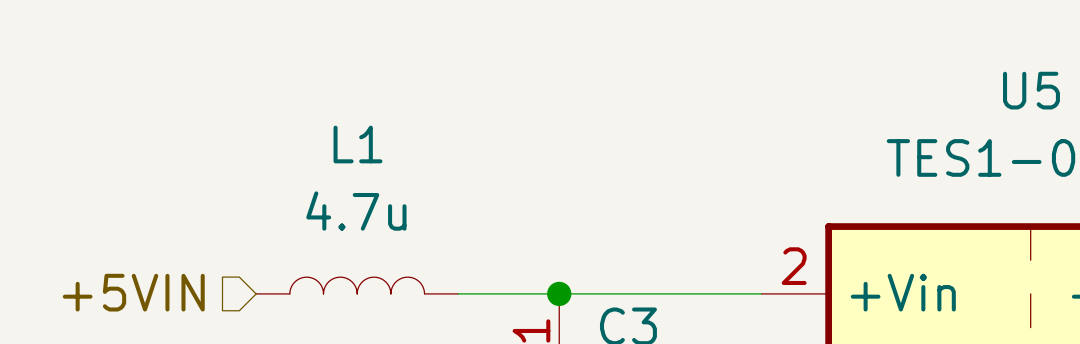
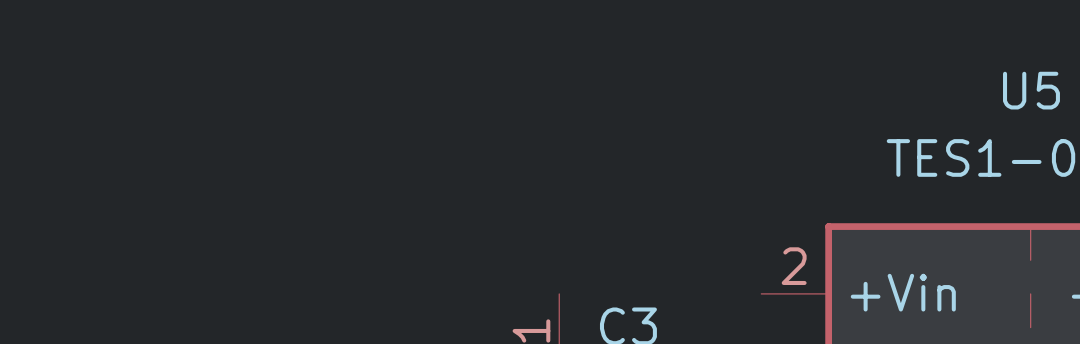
L1: 4.7u (357, 285) -> none
hierarchical label: +5VIN (133, 292) -> none
wire: (458, 293) (761, 293) -> none
junction: (559, 293) -> none

